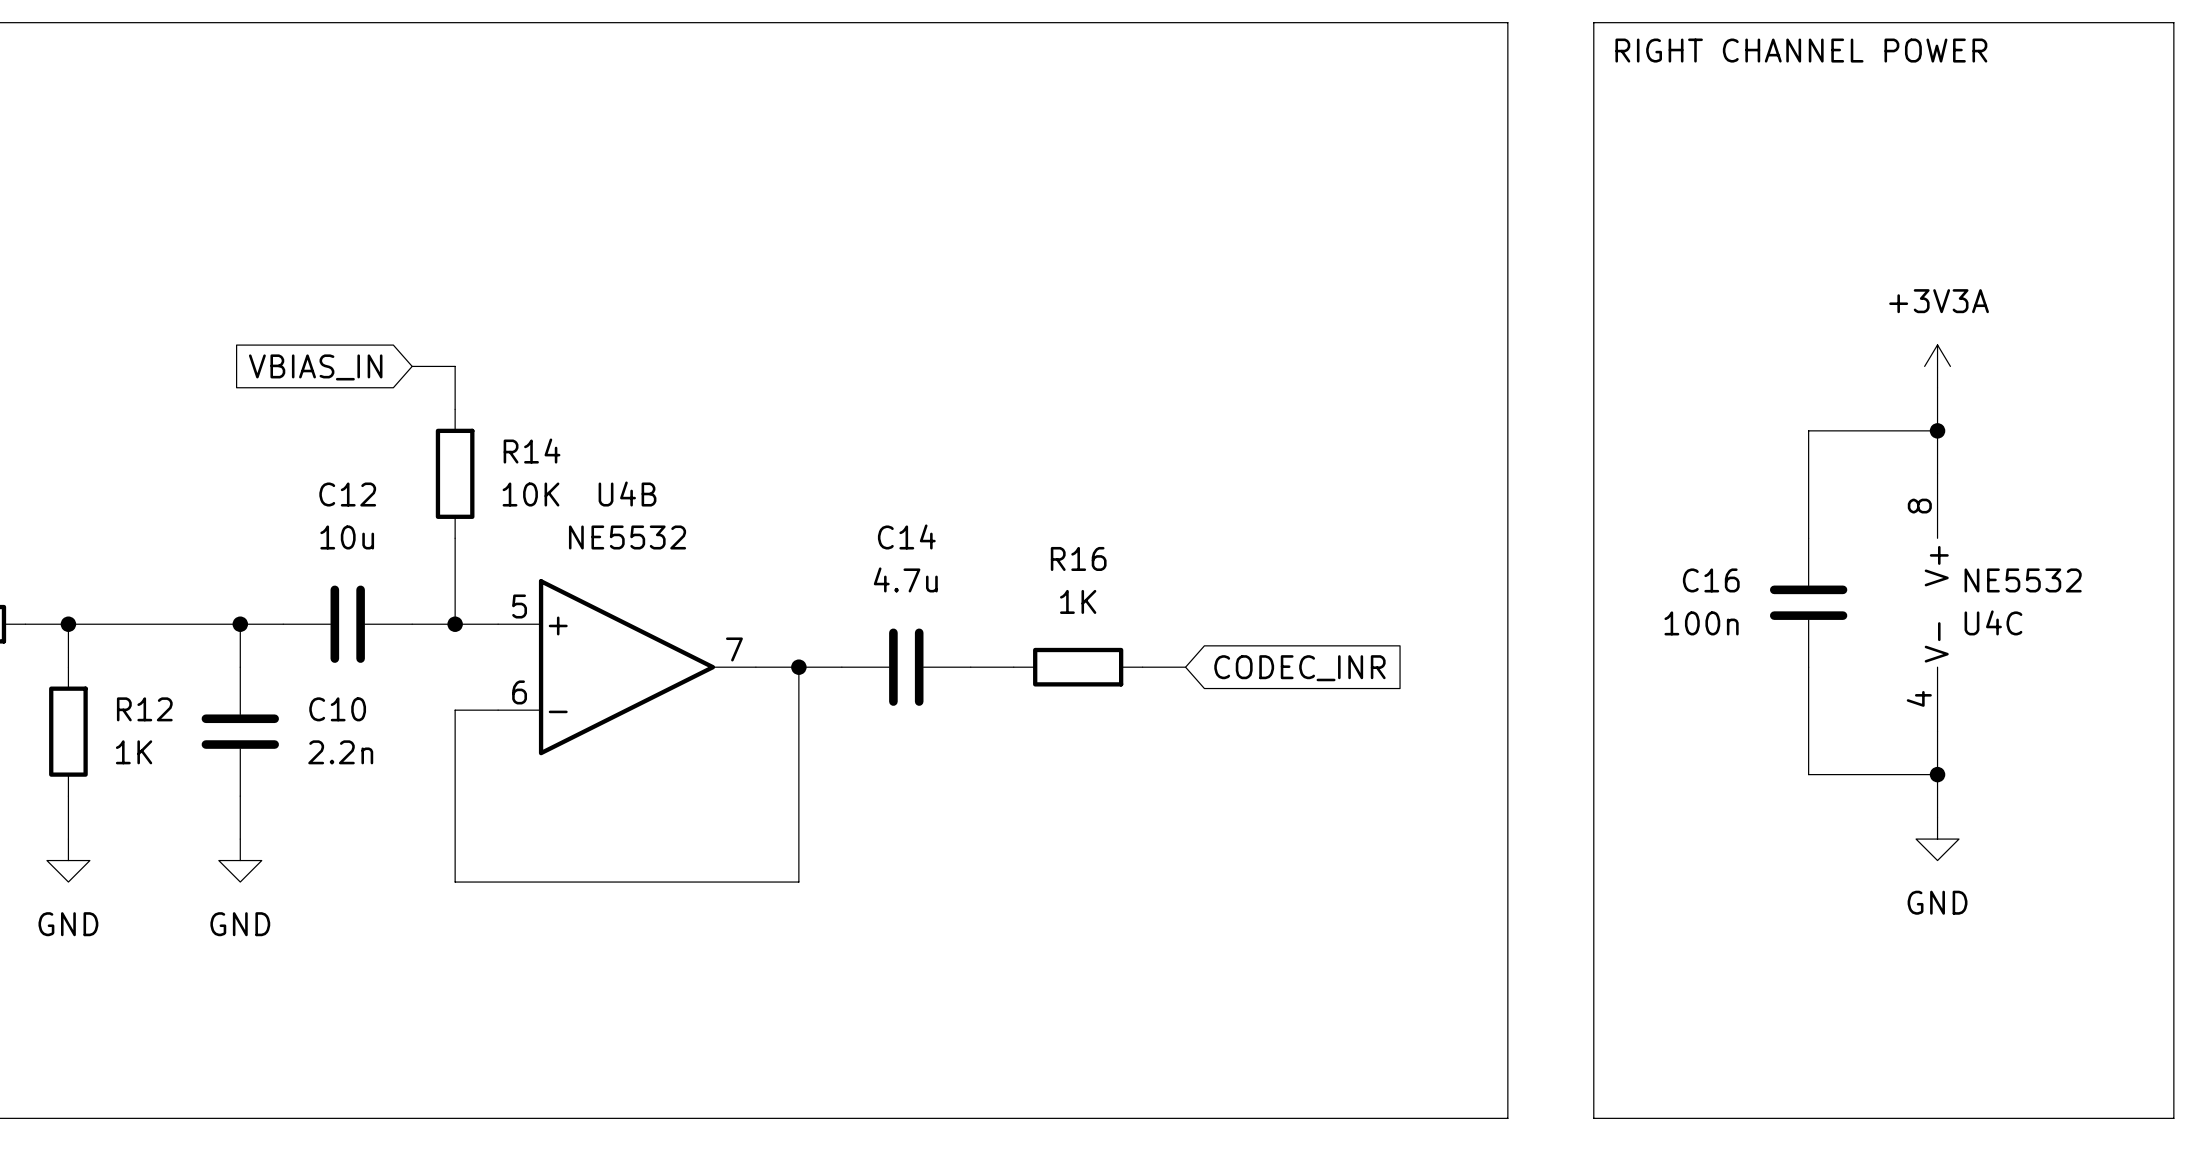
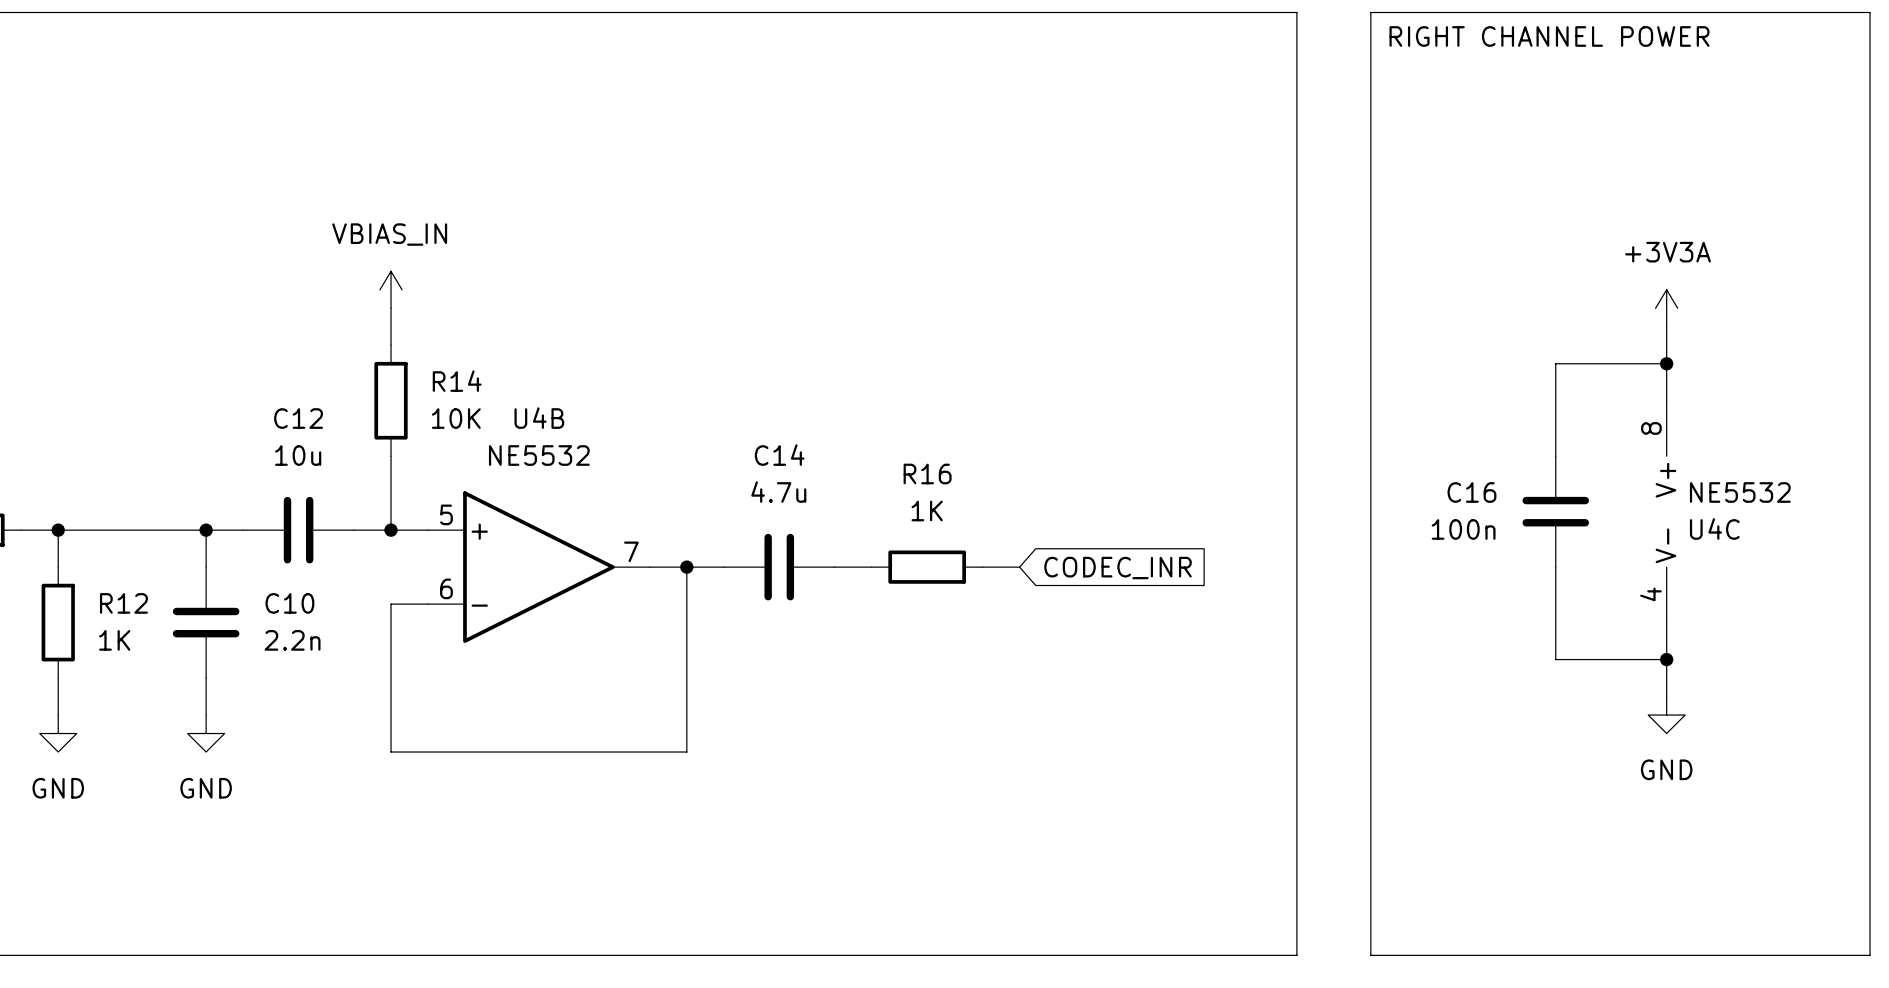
power symbol: none -> VBIAS_IN (391, 289)
wire: (412, 366) (455, 366) -> none
global label: VBIAS_IN (315, 367) -> none

